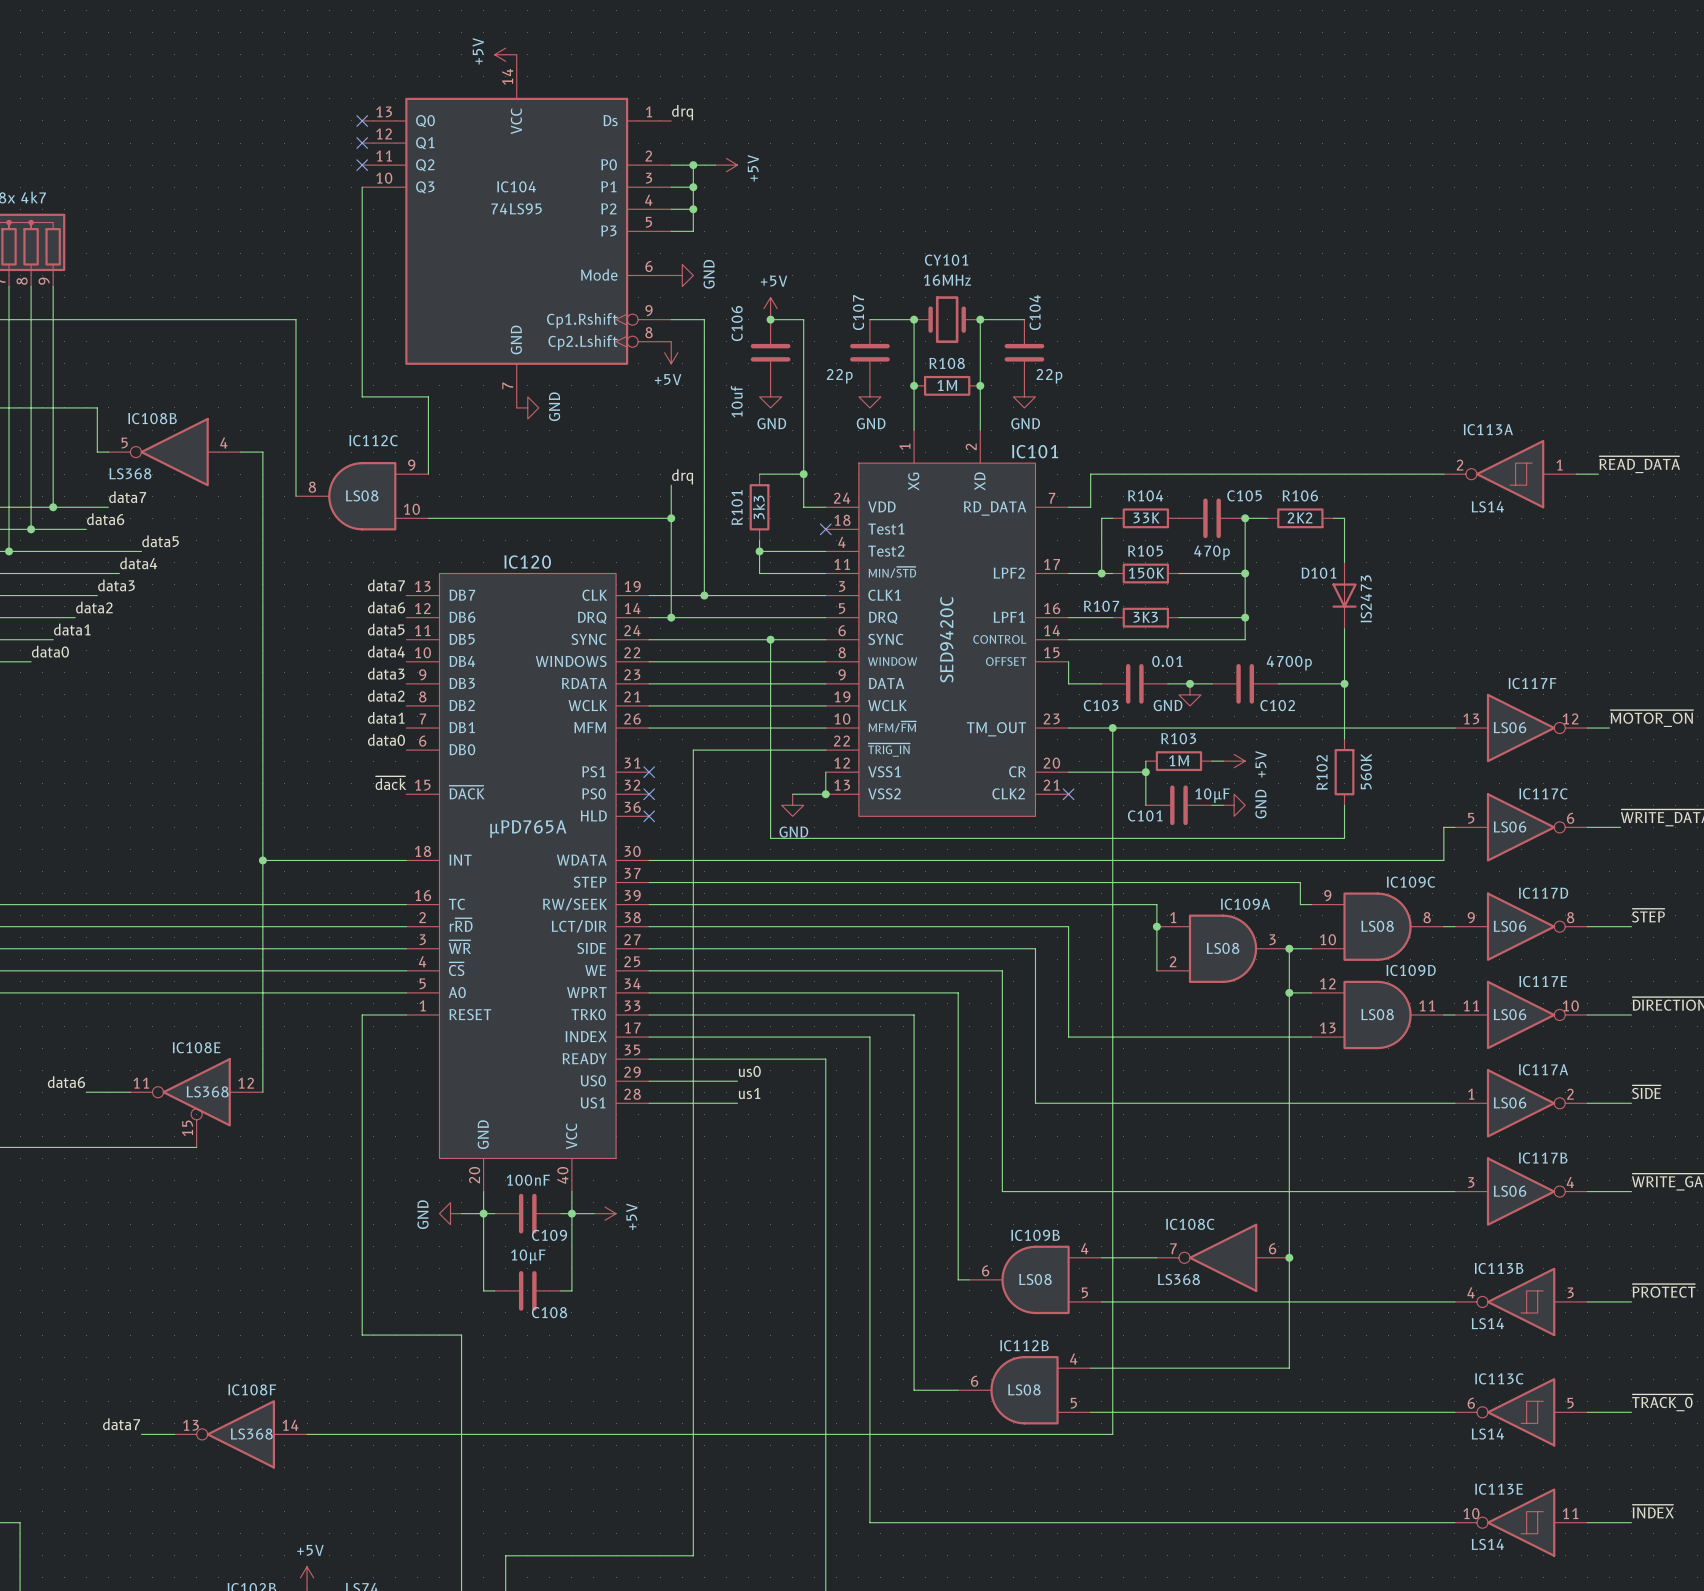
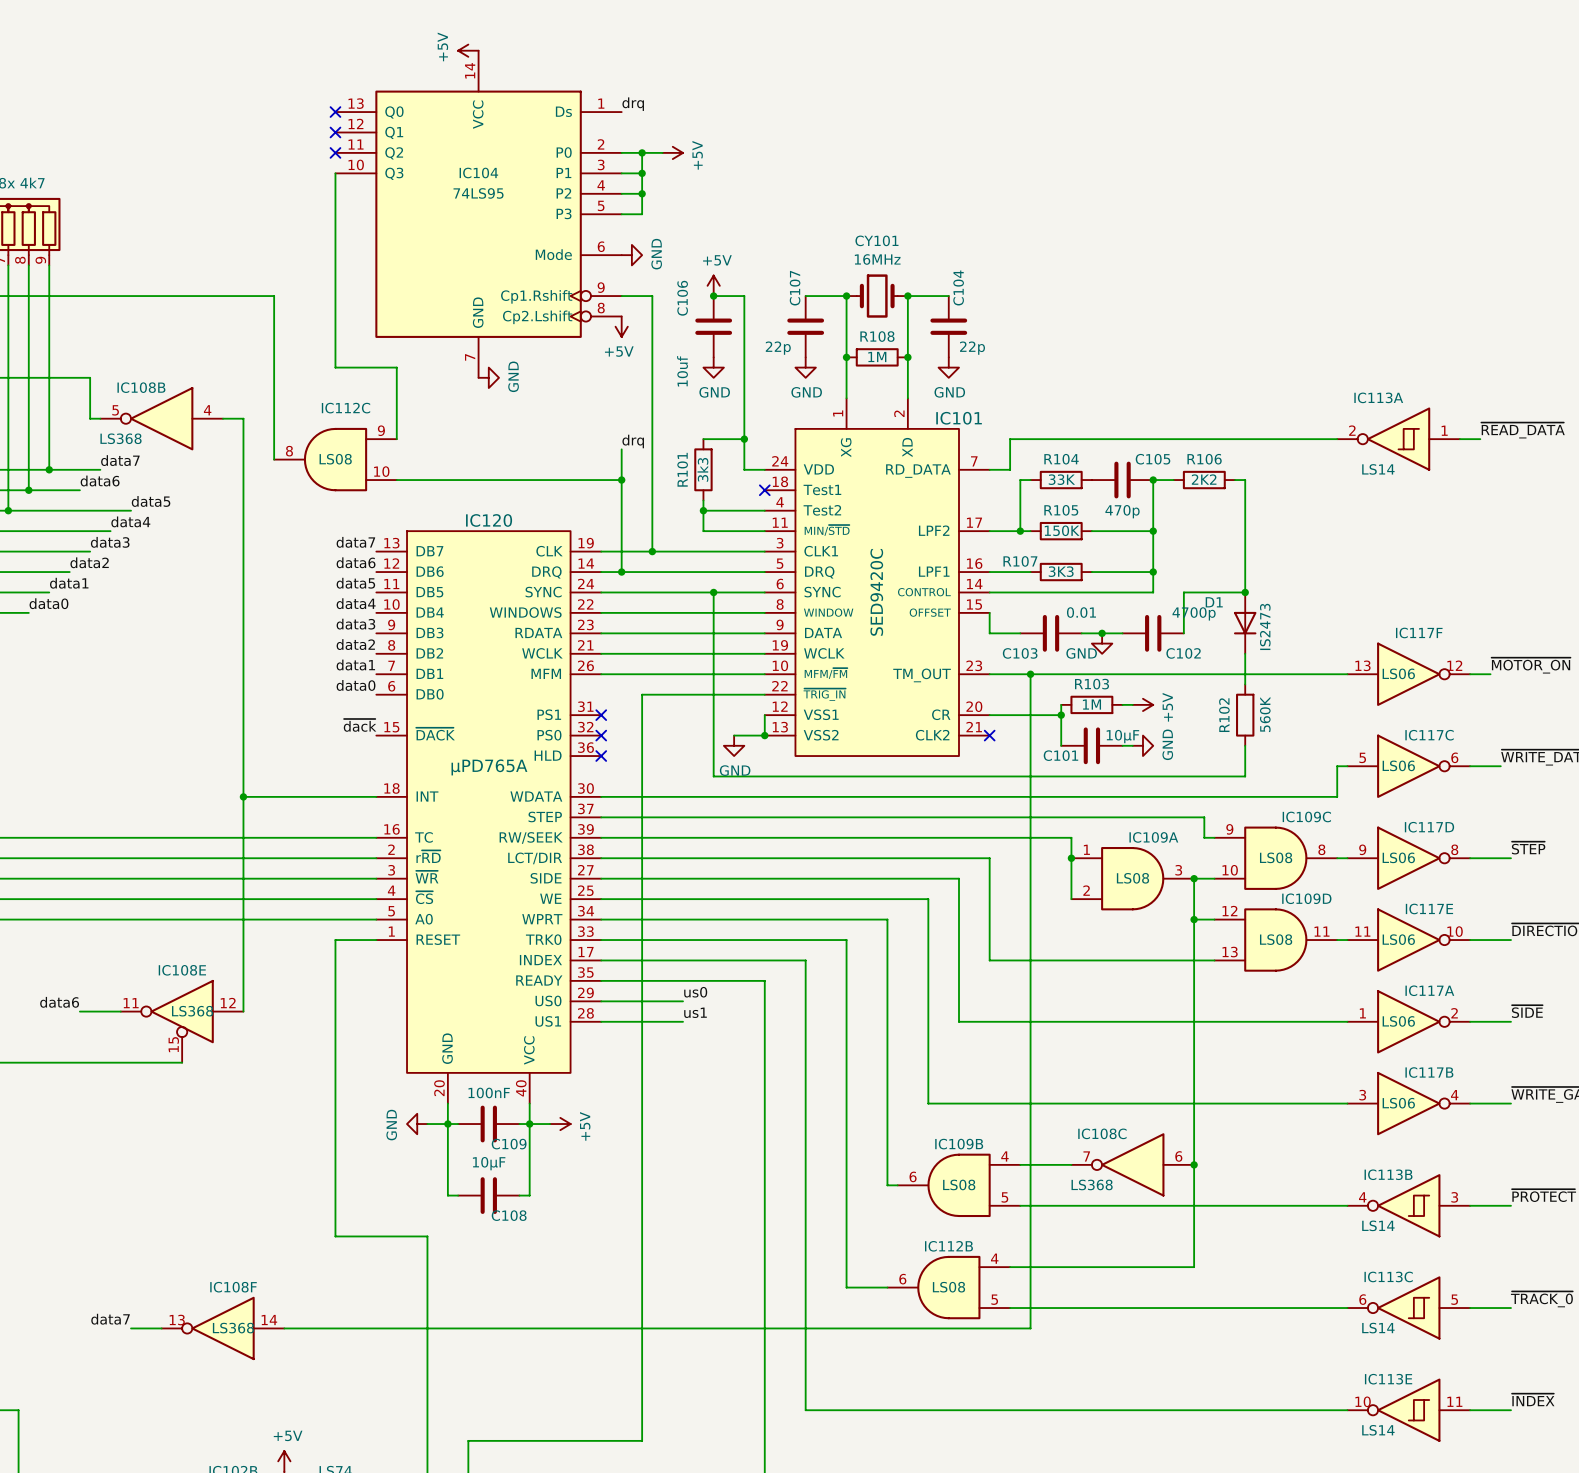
D101: IS2473 (1344, 595) -> none
D1: none -> IS2473 (1245, 623)
wire: (1278, 683) (1344, 683) -> (1183, 633) (1183, 592) (1245, 592)
junction position: (1344, 683) -> (1245, 592)

